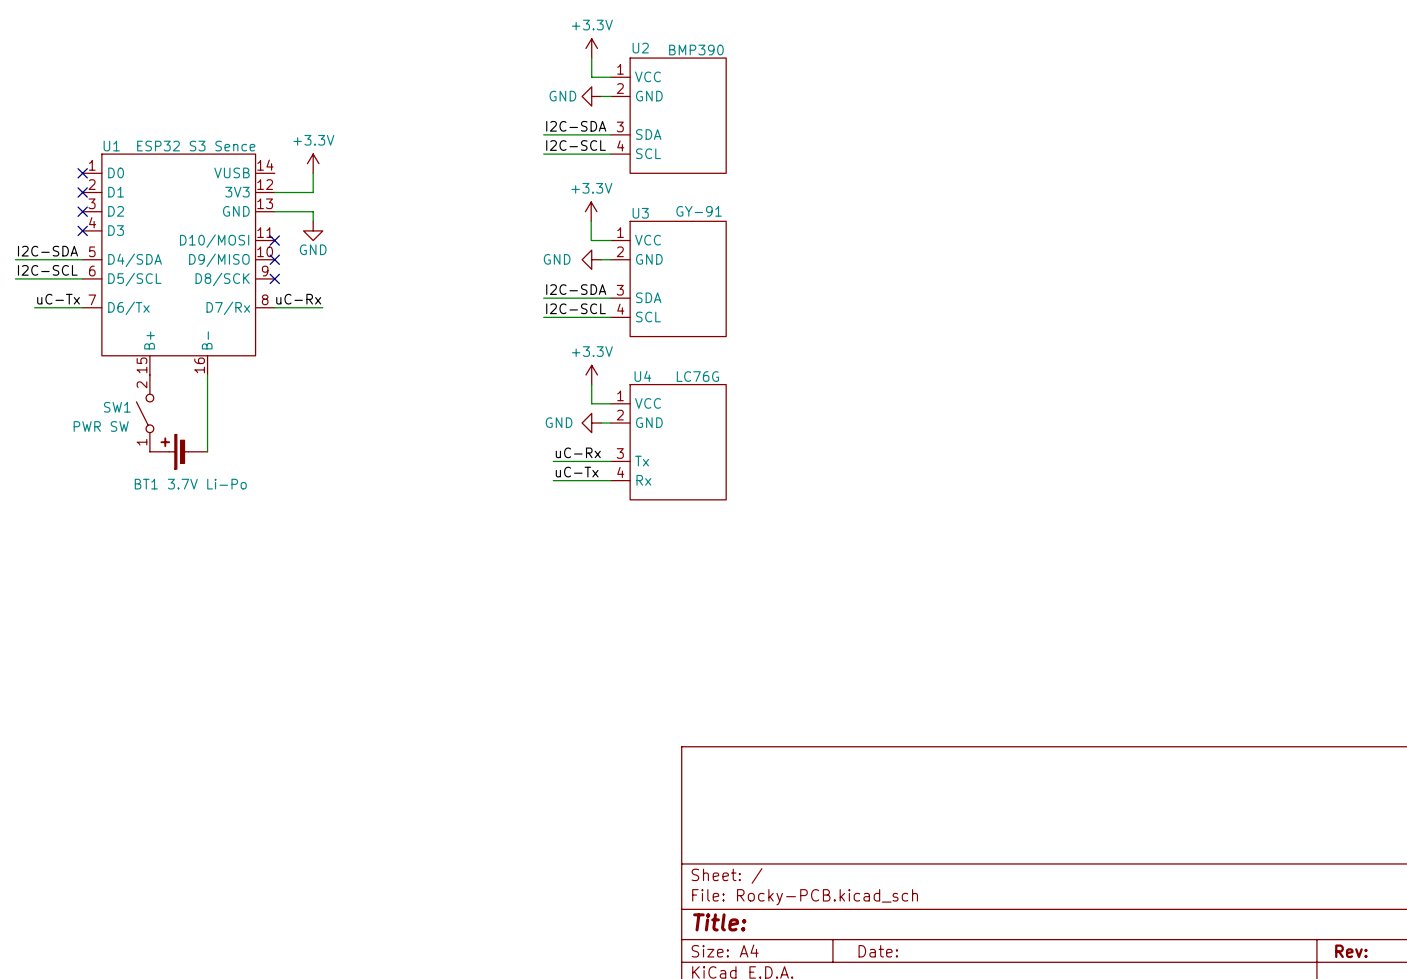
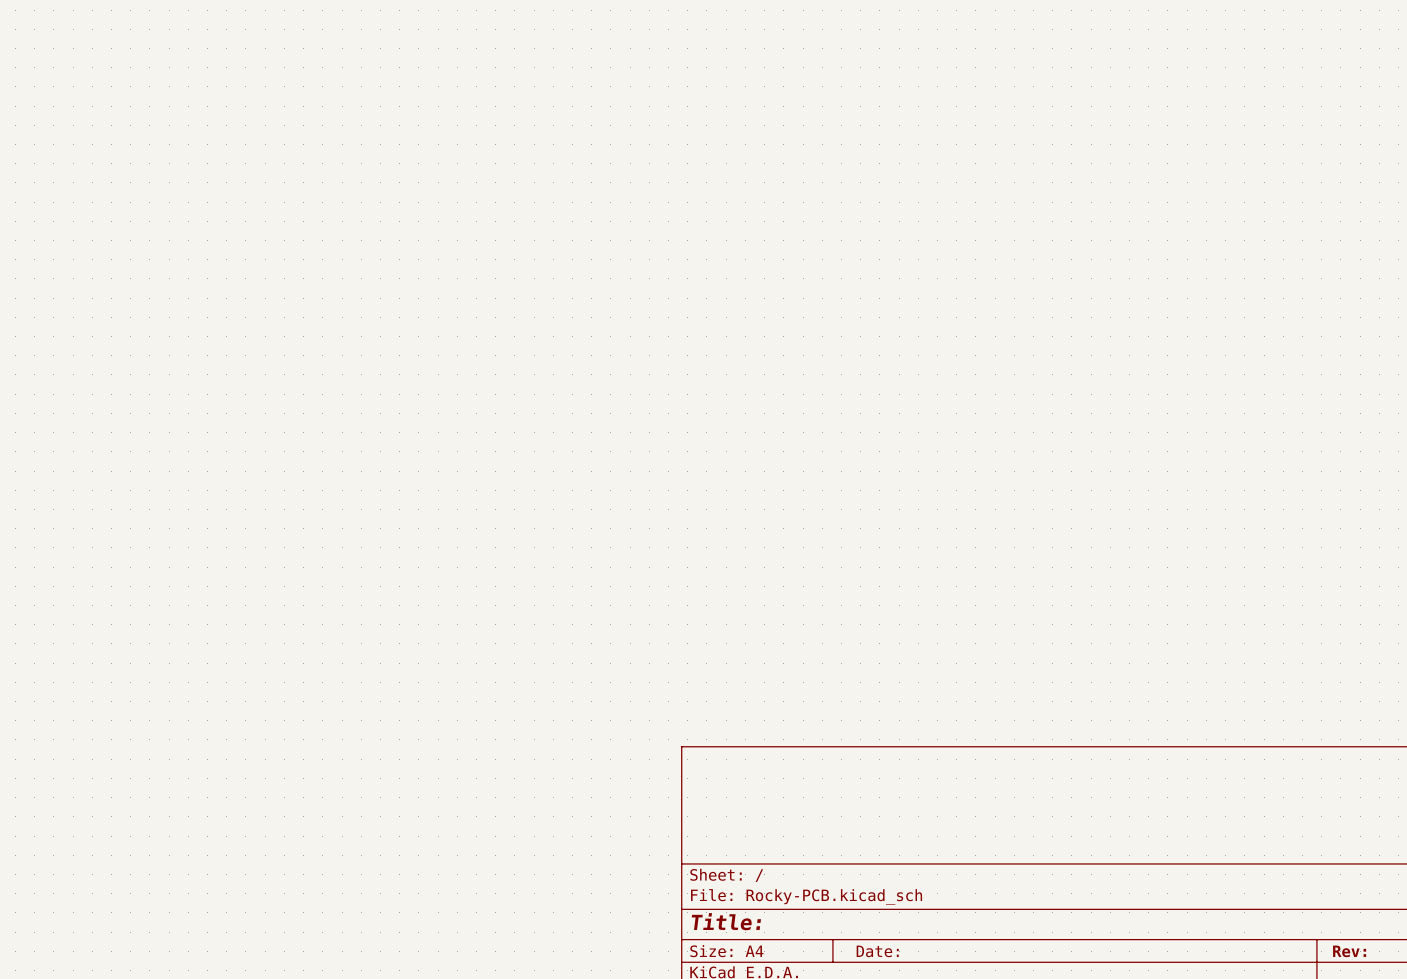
power symbol: +3.3V (591, 48) -> none
wire: (591, 58) (591, 77) (610, 77) -> none
power symbol: GND (591, 96) -> none
wire: (601, 96) (610, 96) -> none
U2: BMP390 (668, 115) -> none
label: I2C-SDA (576, 126) -> none
wire: (543, 134) (610, 134) -> none
label: I2C-SCL (576, 145) -> none
wire: (543, 154) (610, 154) -> none
power symbol: +3.3V (313, 163) -> none
no-connect mark: (82, 173) -> none
wire: (313, 173) (313, 192) (274, 192) -> none
no-connect mark: (82, 192) -> none
no-connect mark: (82, 211) -> none
wire: (274, 211) (313, 211) (313, 221) -> none
power symbol: +3.3V (591, 211) -> none
wire: (591, 221) (591, 240) -> none
no-connect mark: (82, 230) -> none
power symbol: GND (313, 230) -> none
no-connect mark: (274, 240) -> none
wire: (591, 240) (610, 240) -> none
label: I2C-SDA (48, 251) -> none
wire: (15, 259) (82, 259) -> none
no-connect mark: (274, 259) -> none
power symbol: GND (591, 259) -> none
wire: (601, 259) (610, 259) -> none
U1: ESP32 S3 Sence (178, 264) -> none
label: I2C-SCL (47, 270) -> none
wire: (15, 278) (82, 278) -> none
no-connect mark: (274, 278) -> none
U3: GY-91 (668, 278) -> none
label: I2C-SDA (576, 289) -> none
wire: (543, 298) (610, 298) -> none
label: uC-Tx (58, 299) -> none
label: uC-Rx (298, 299) -> none
wire: (34, 307) (82, 307) -> none
wire: (274, 307) (322, 307) -> none
label: I2C-SCL (576, 308) -> none
wire: (543, 317) (610, 317) -> none
wire: (207, 374) (207, 451) -> none
power symbol: +3.3V (591, 374) -> none
wire: (591, 384) (591, 403) (610, 403) -> none
SW1: PWR SW (145, 413) -> none
power symbol: GND (591, 423) -> none
wire: (601, 423) (610, 423) -> none
U4: LC76G (668, 442) -> none
BT1: 3.7V Li-Po (178, 451) -> none
label: uC-Rx (578, 452) -> none
wire: (553, 461) (610, 461) -> none
label: uC-Tx (577, 472) -> none
wire: (553, 480) (610, 480) -> none

